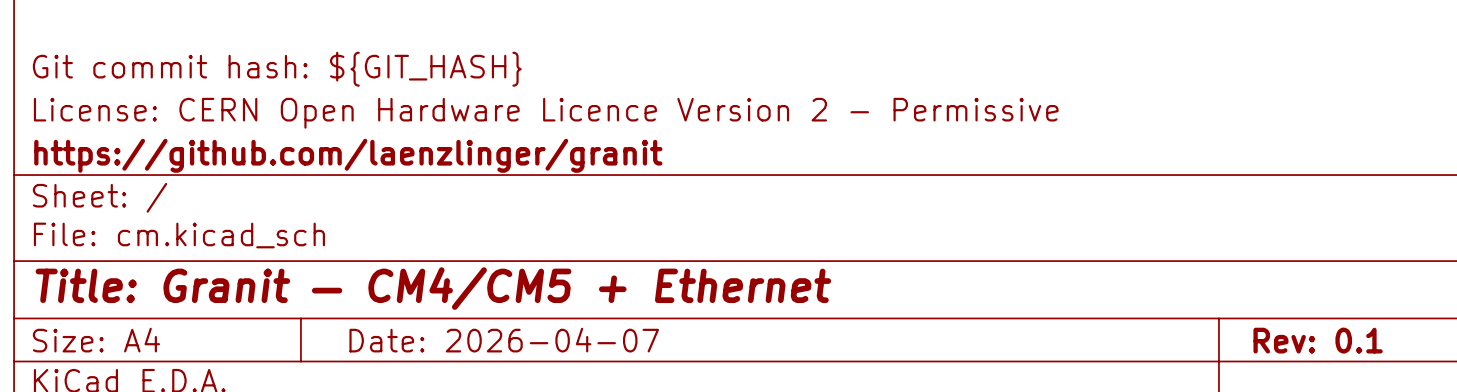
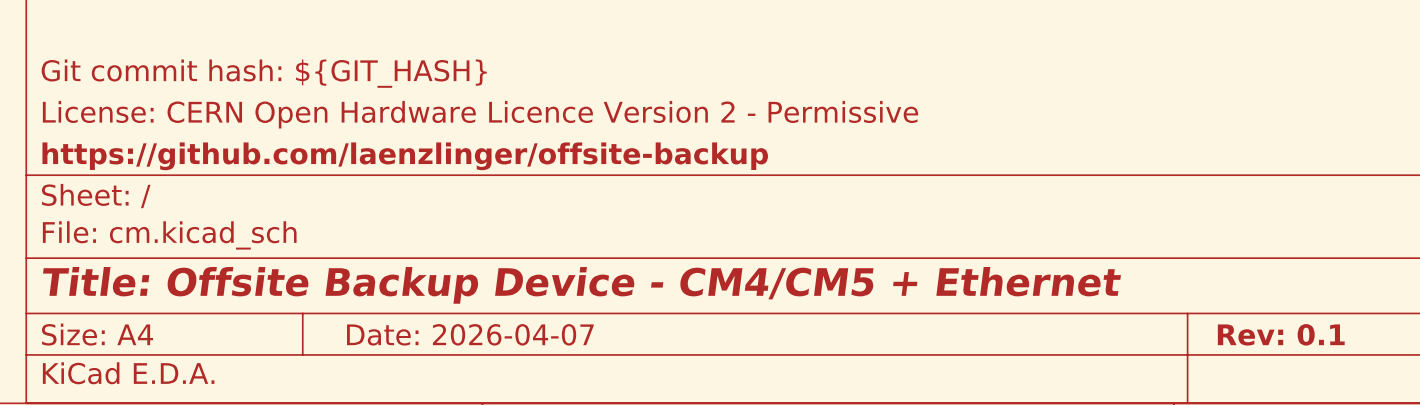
title block: https://github.com/laenzlinger/granit (348, 155) -> https://github.com/laenzlinger/offsite-backup (405, 156)
title block: Title: Granit — CM4/CM5 + Ethernet (433, 288) -> Title: Offsite Backup Device - CM4/CM5 + Ethernet (581, 285)

